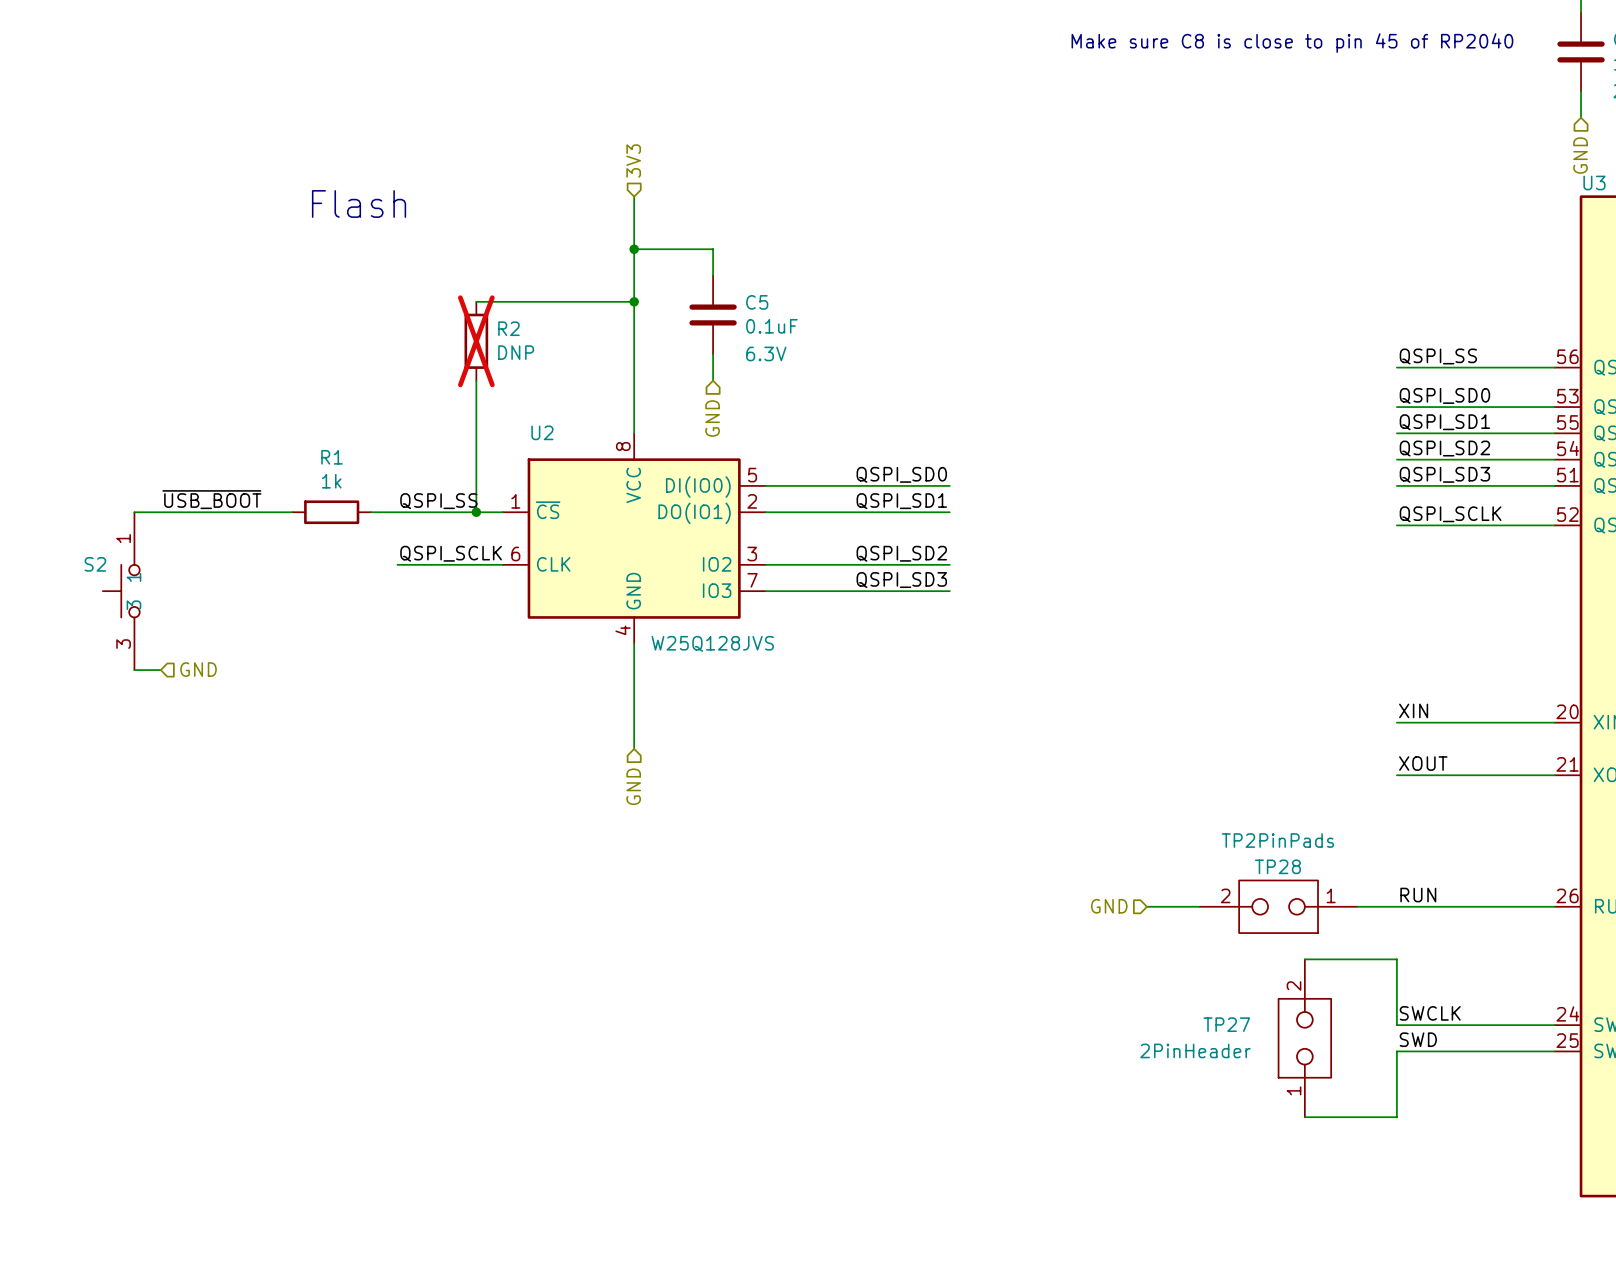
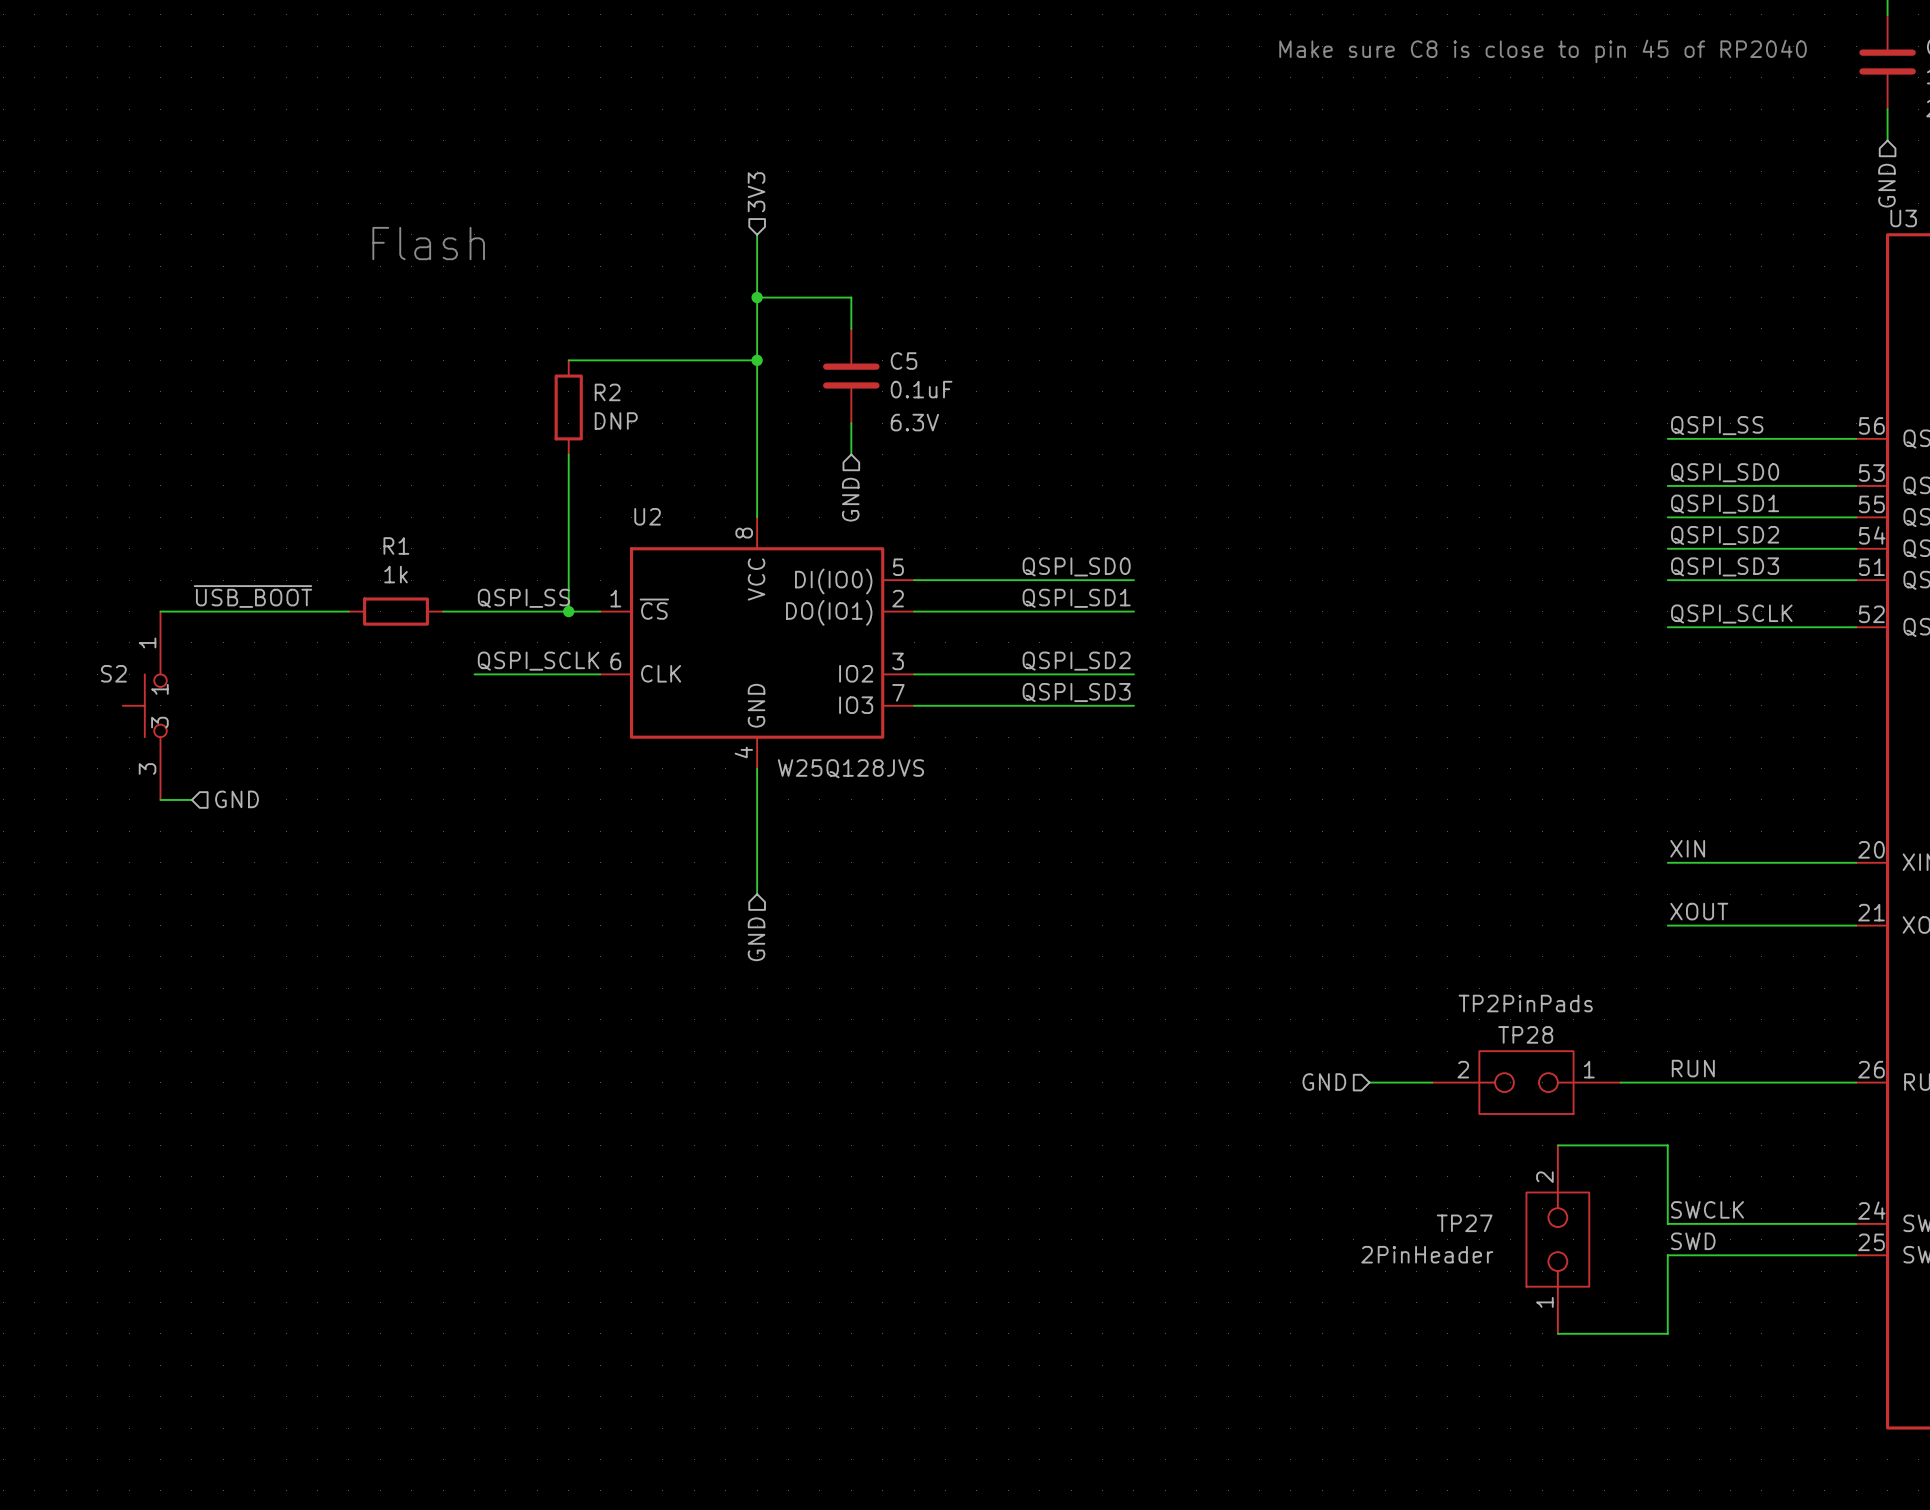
R2 do-not-place cross: (476, 341) -> none

